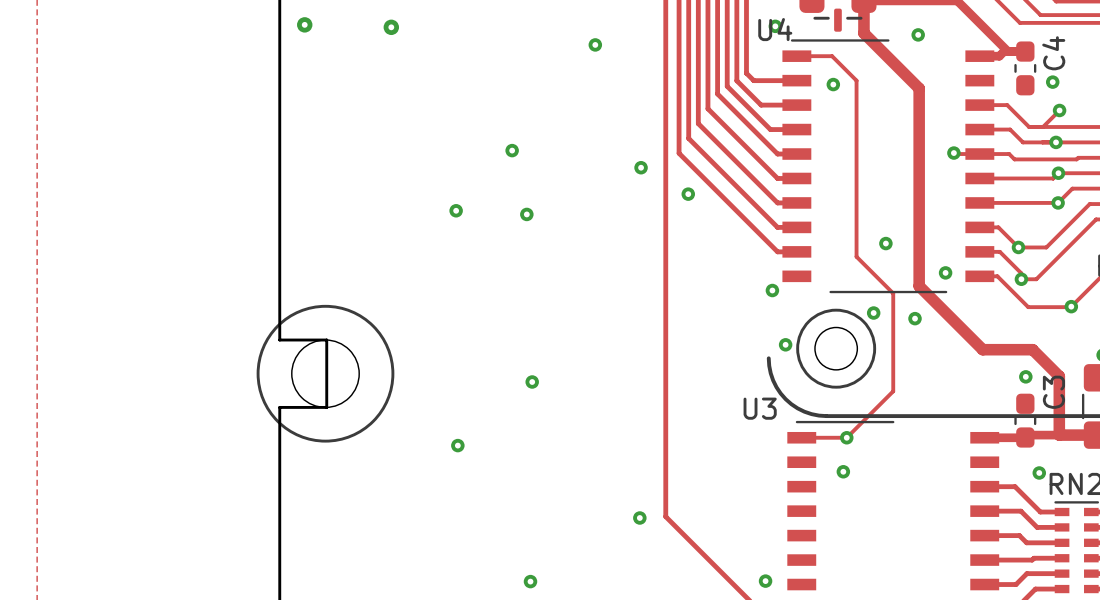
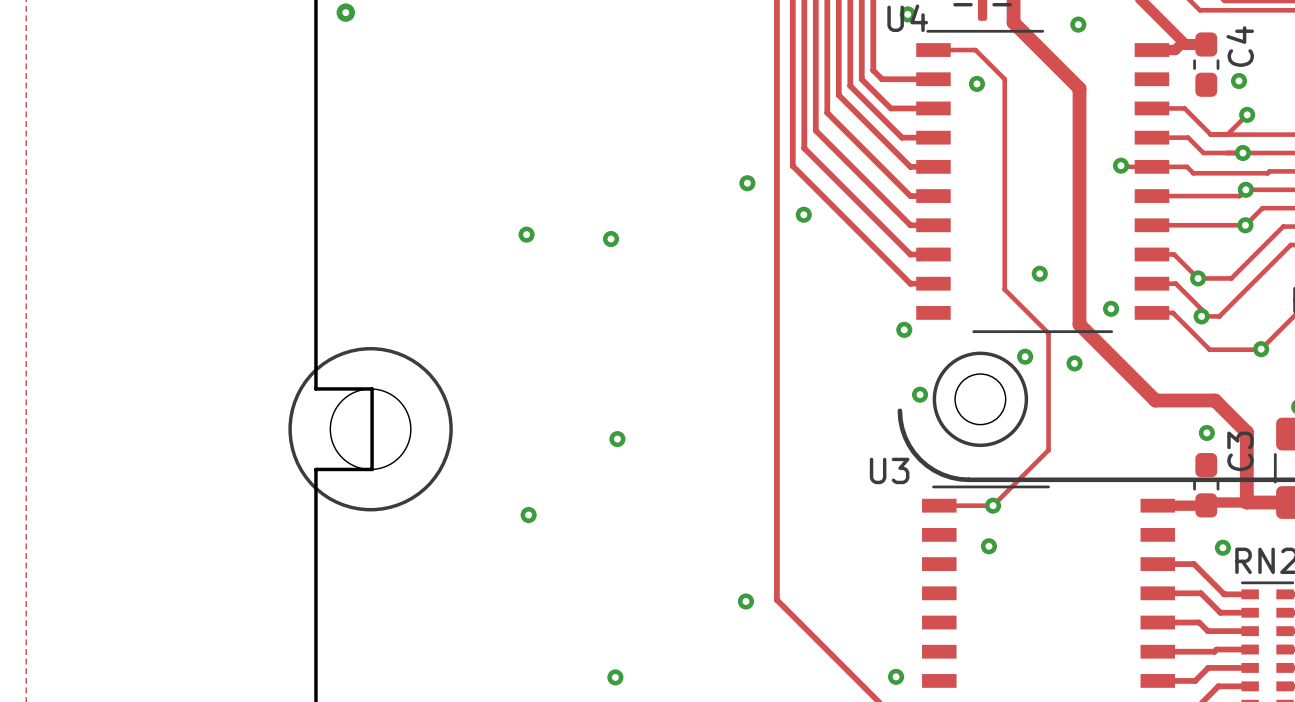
via: (391, 27) -> none
via: (595, 44) -> none
via: (512, 150) -> none

